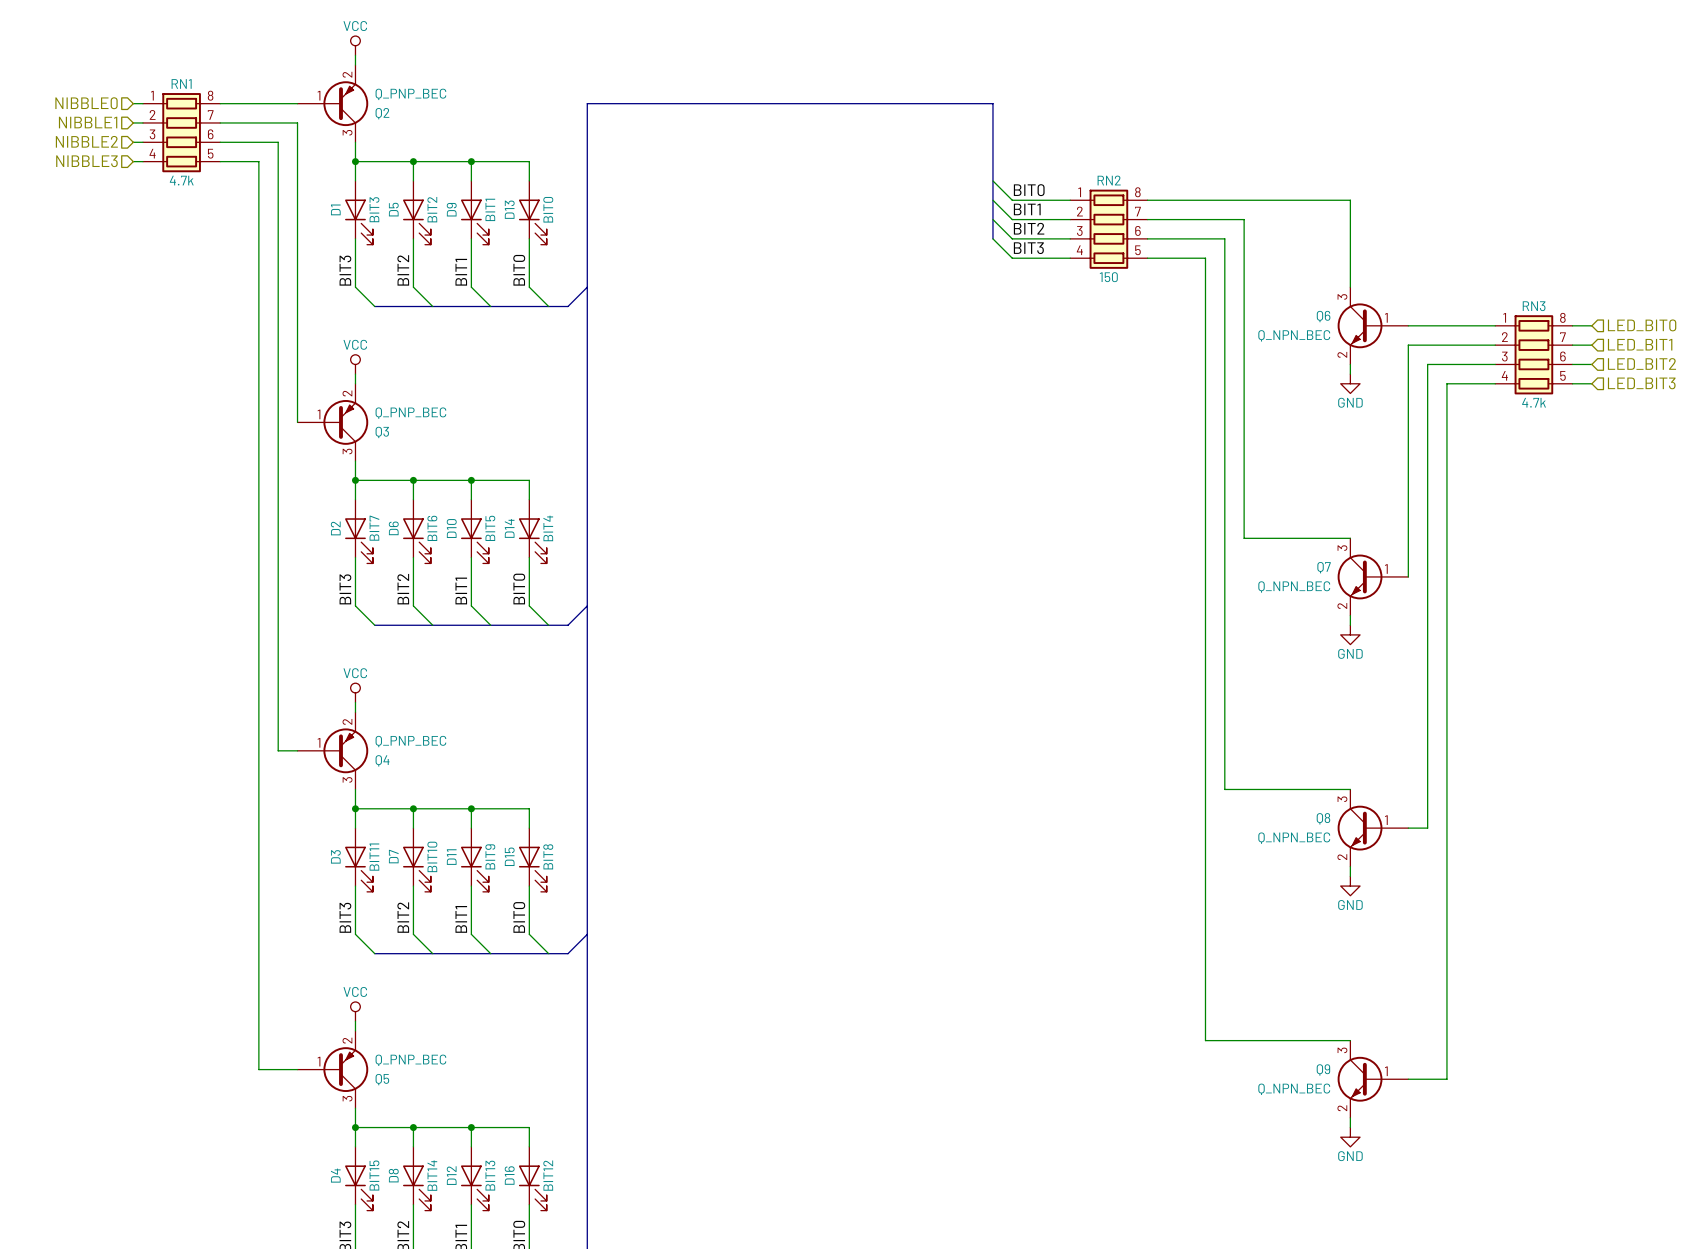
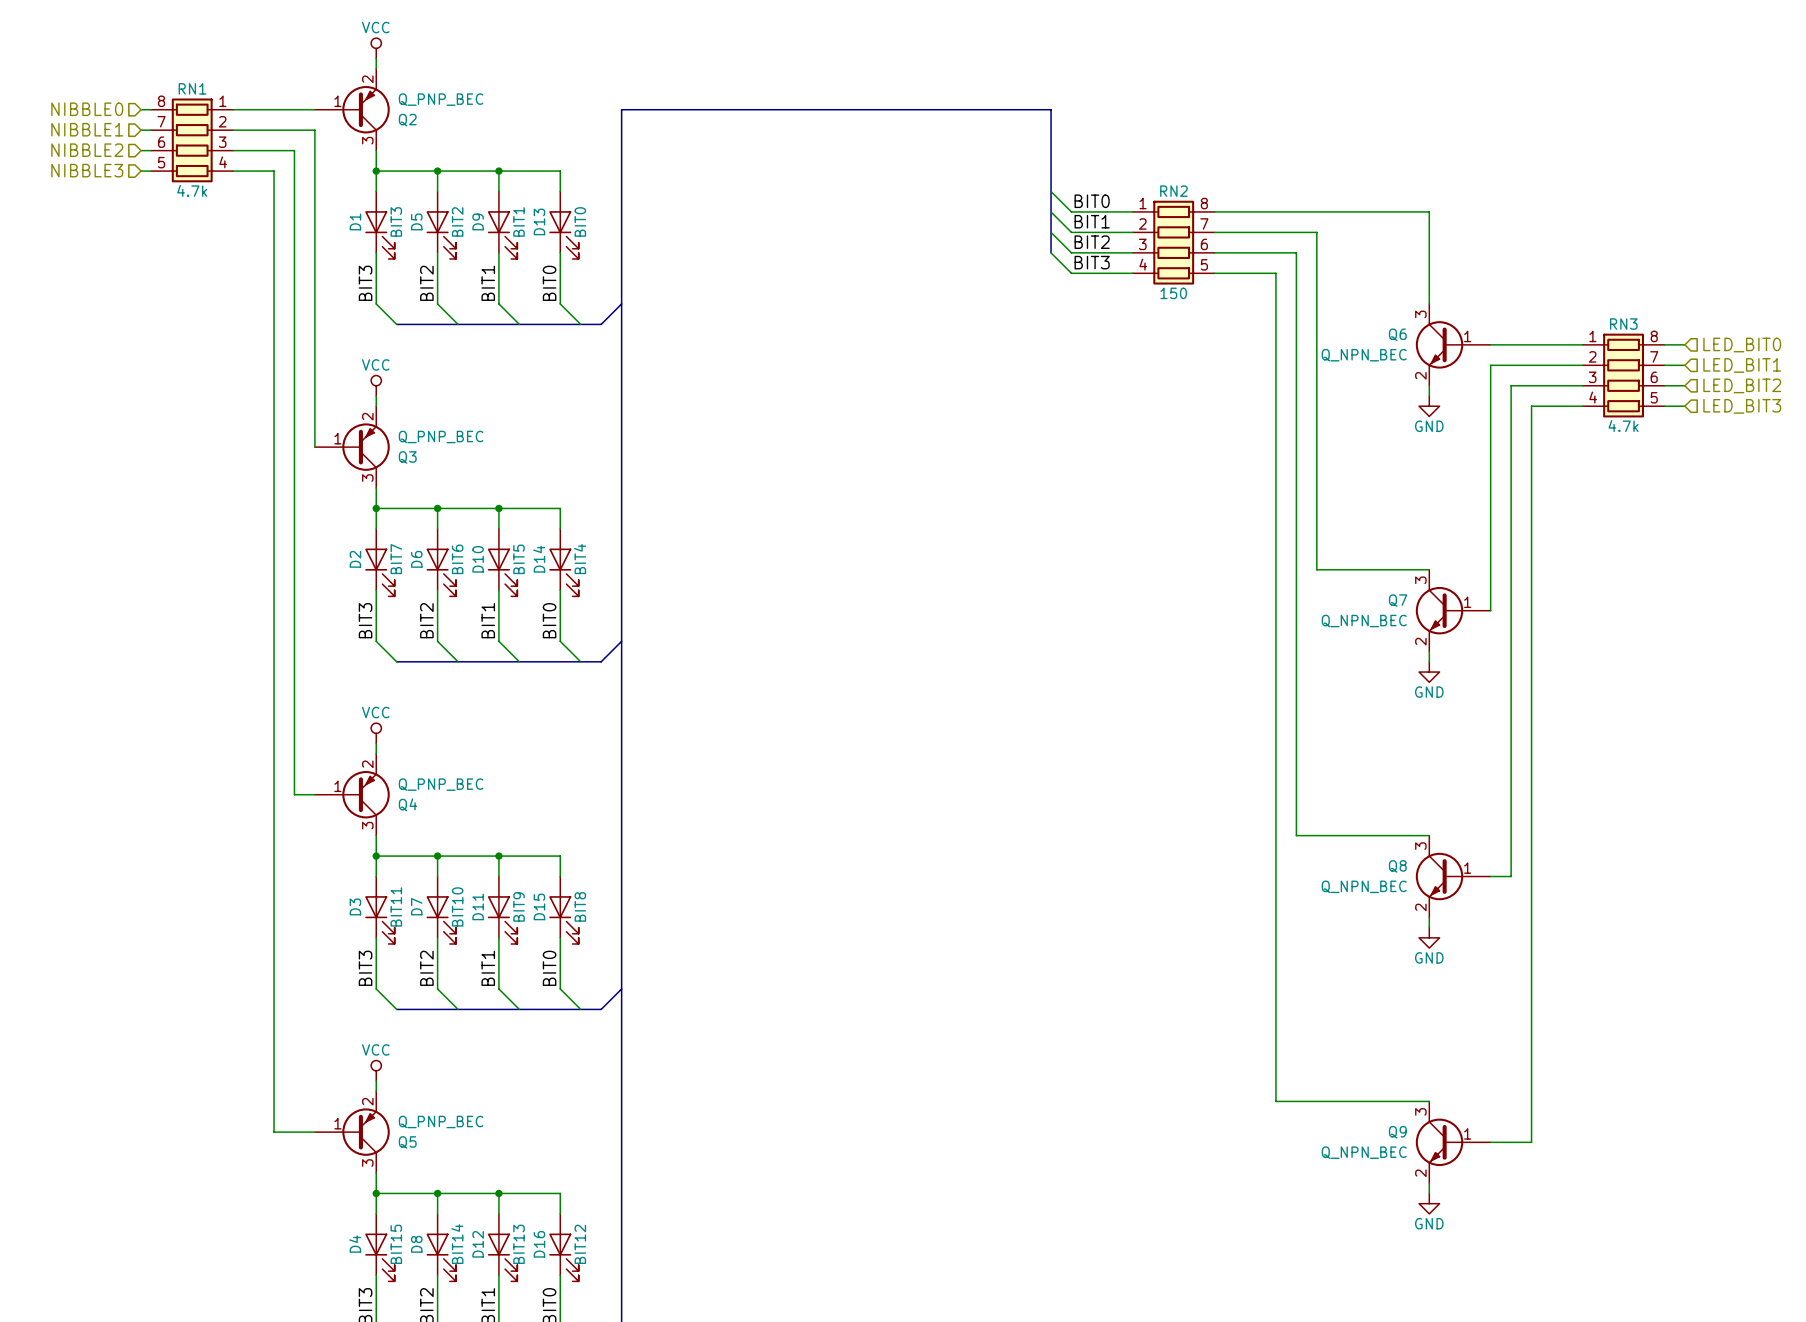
RN1 flip: as is (181, 132) -> left-right (192, 140)

